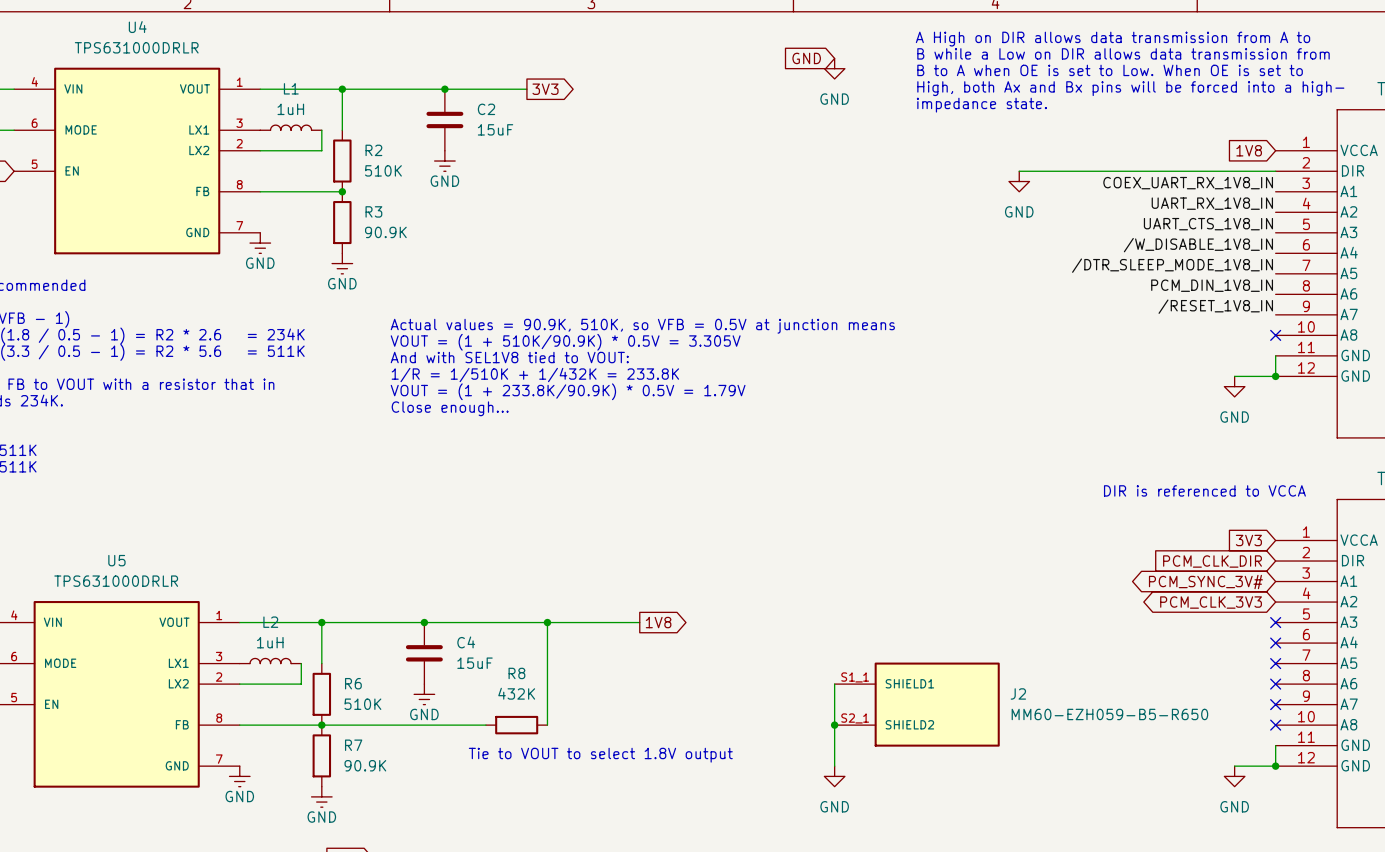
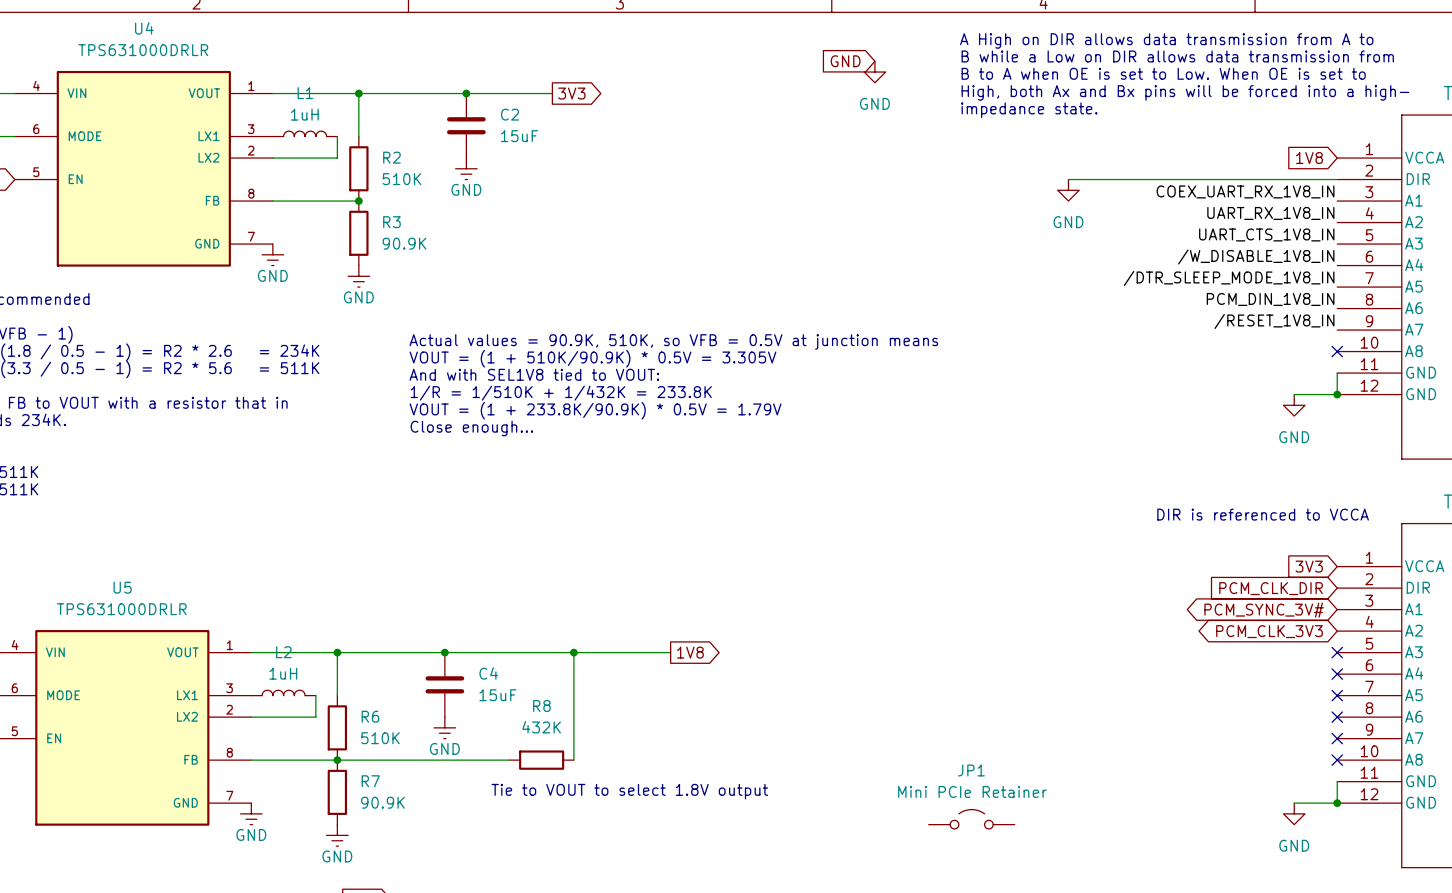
wire: (834, 684) (834, 766) -> none
J2: MM60-EZH059-B5-R650 (917, 704) -> none
junction: (834, 725) -> none
power symbol: GND (834, 776) -> none
JP1: none -> Mini PCIe Retainer (971, 819)

